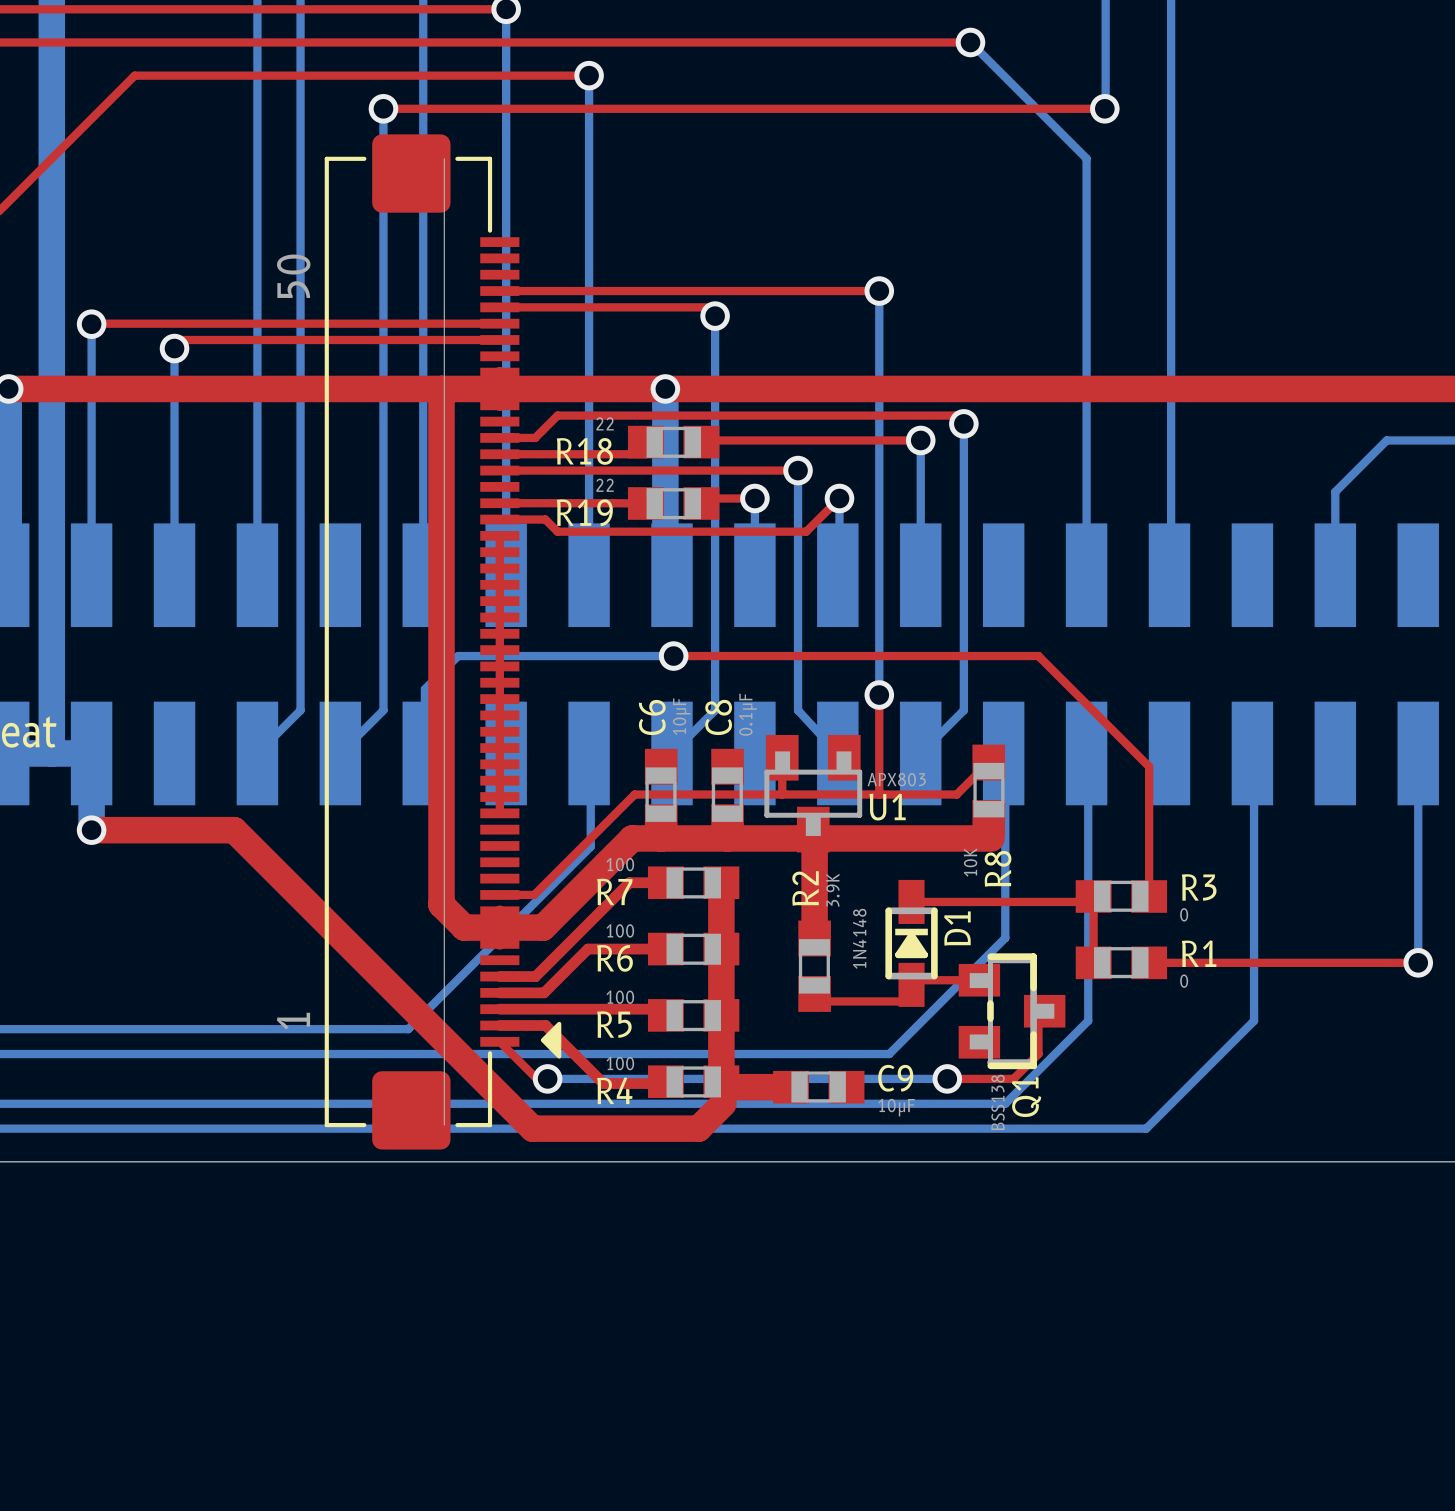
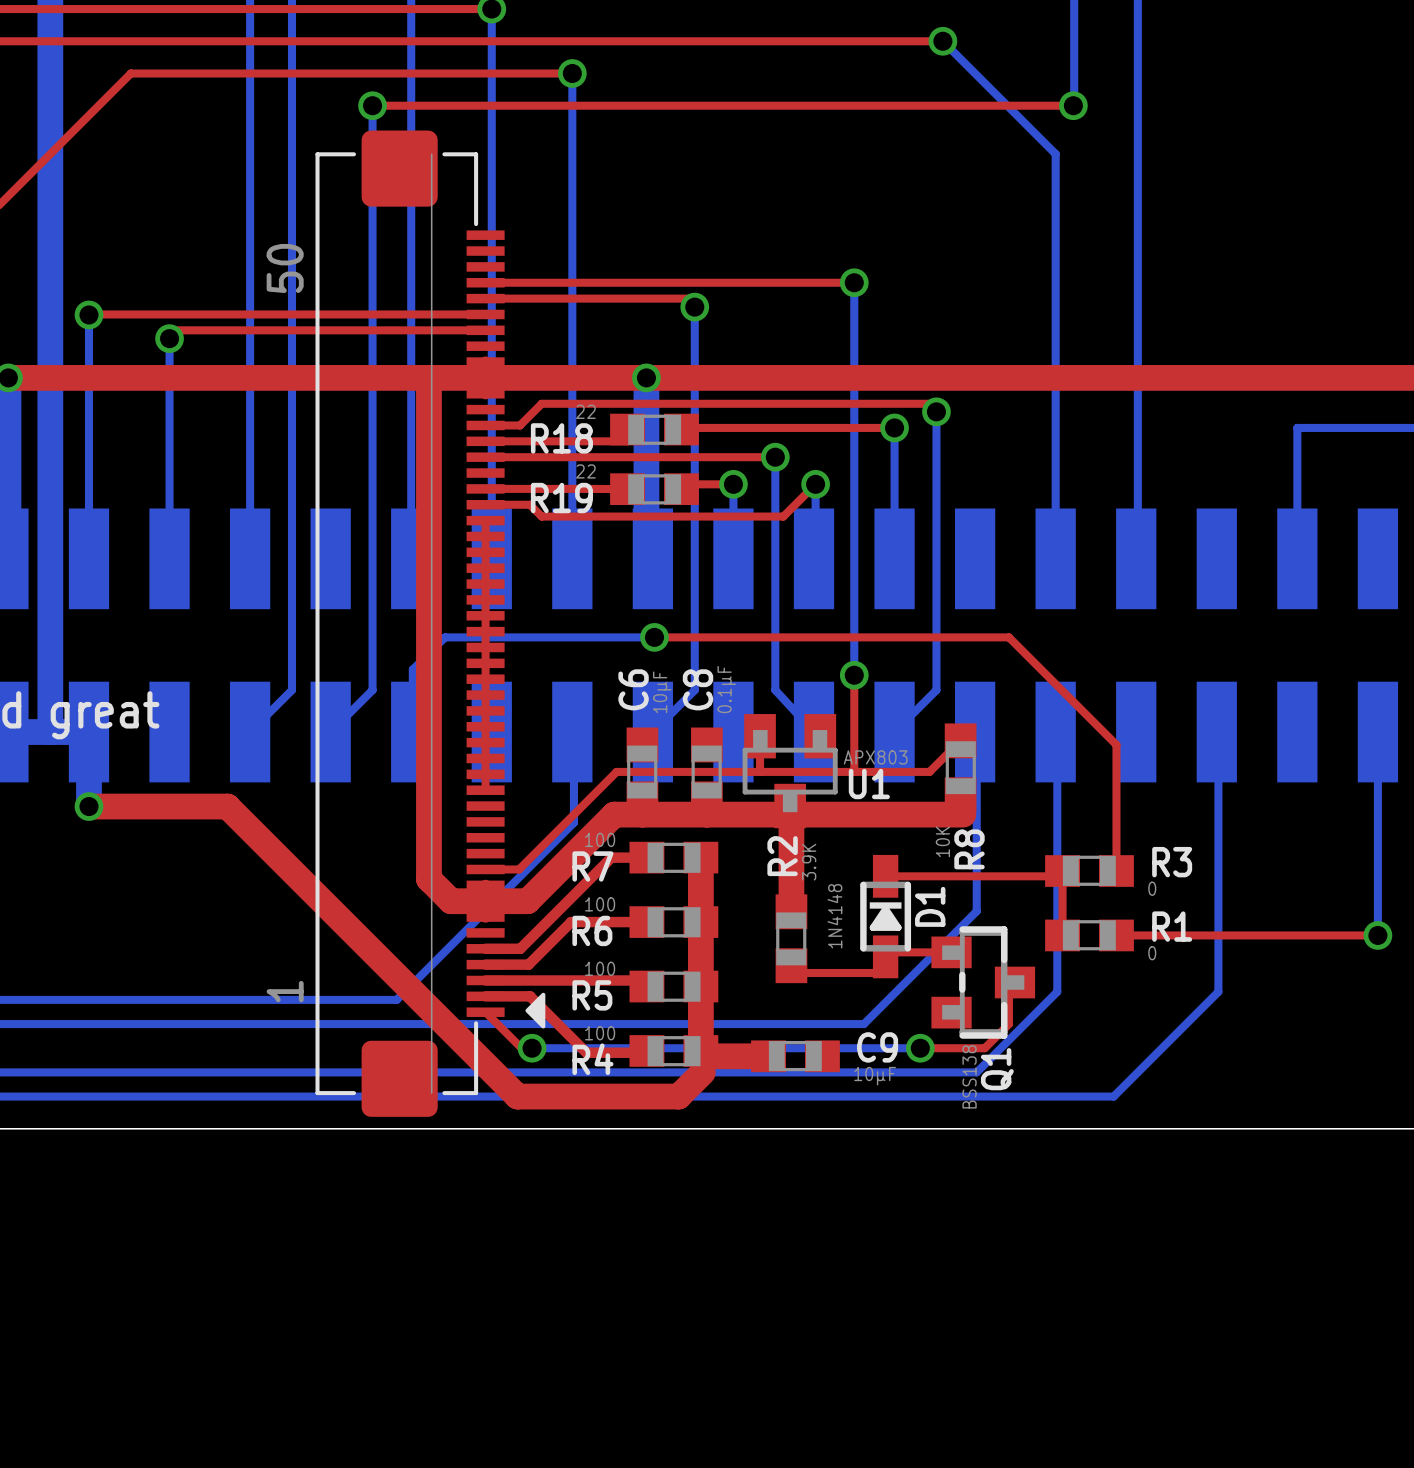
bottom track: (1386, 440) (1335, 491) -> (1347, 427) (1297, 427) (1297, 477)

